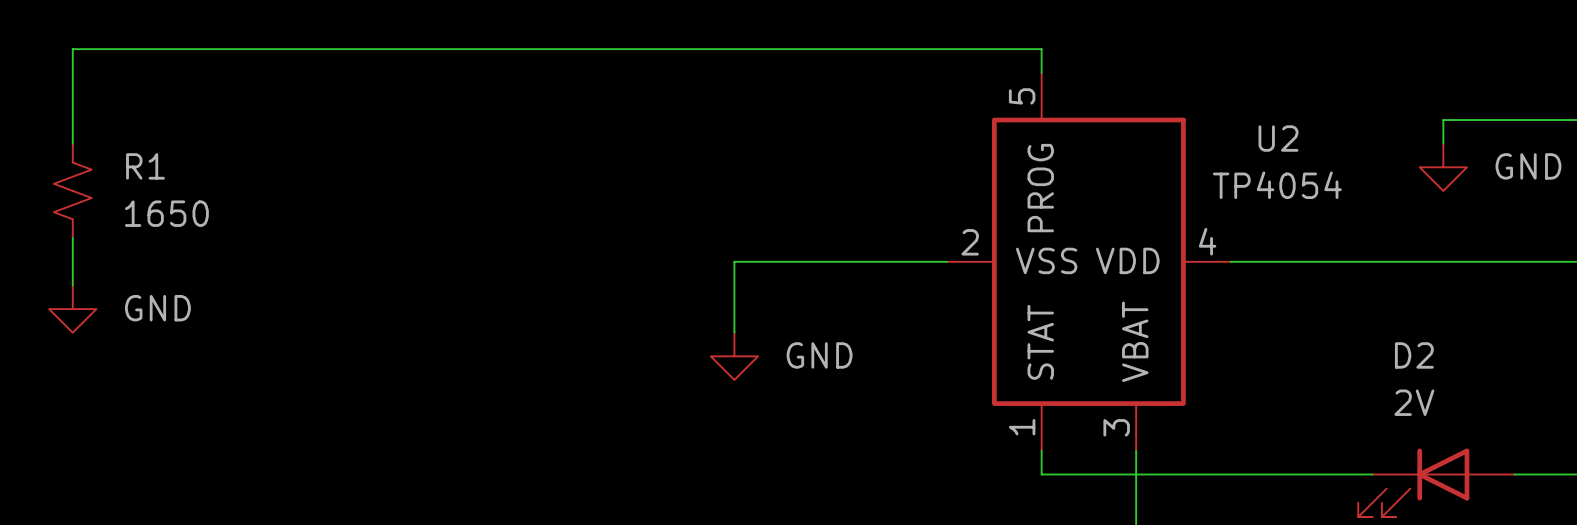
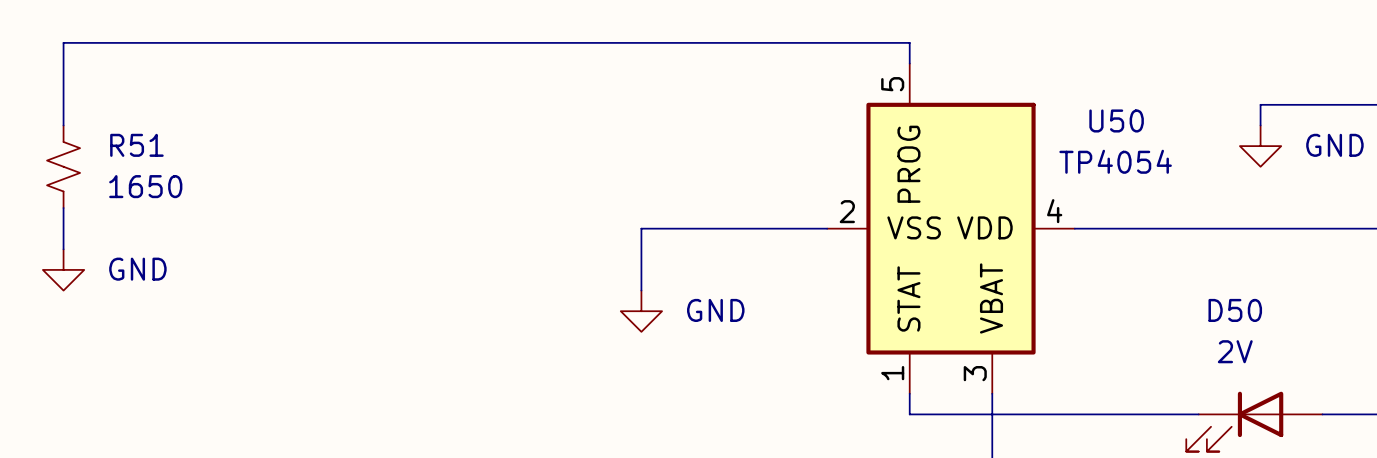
U2 name: U2 (1278, 138) -> U50 (1116, 120)
R1 name: R1 (145, 166) -> R51 (136, 145)
D2 name: D2 (1414, 355) -> D50 (1235, 310)

